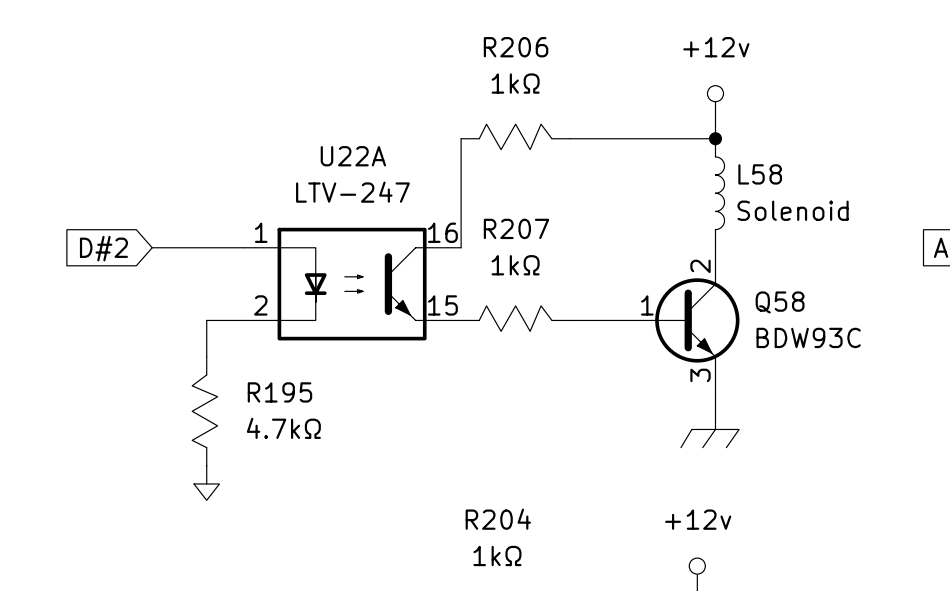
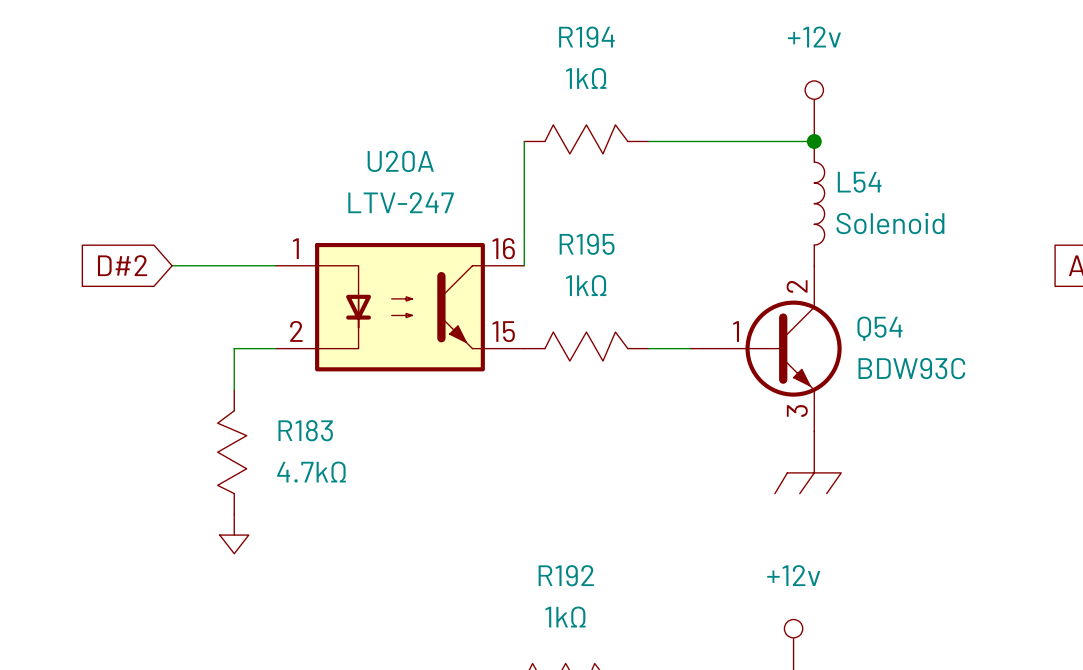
R206 name: R206 (516, 47) -> R194 (586, 37)
U22A name: U22A (353, 156) -> U20A (400, 161)
L58 name: L58 (760, 174) -> L54 (859, 182)
R207 name: R207 (516, 228) -> R195 (587, 244)
Q58 name: Q58 (780, 302) -> Q54 (879, 328)
R195 name: R195 (279, 392) -> R183 (305, 430)
R204 name: R204 (498, 519) -> R192 (566, 575)

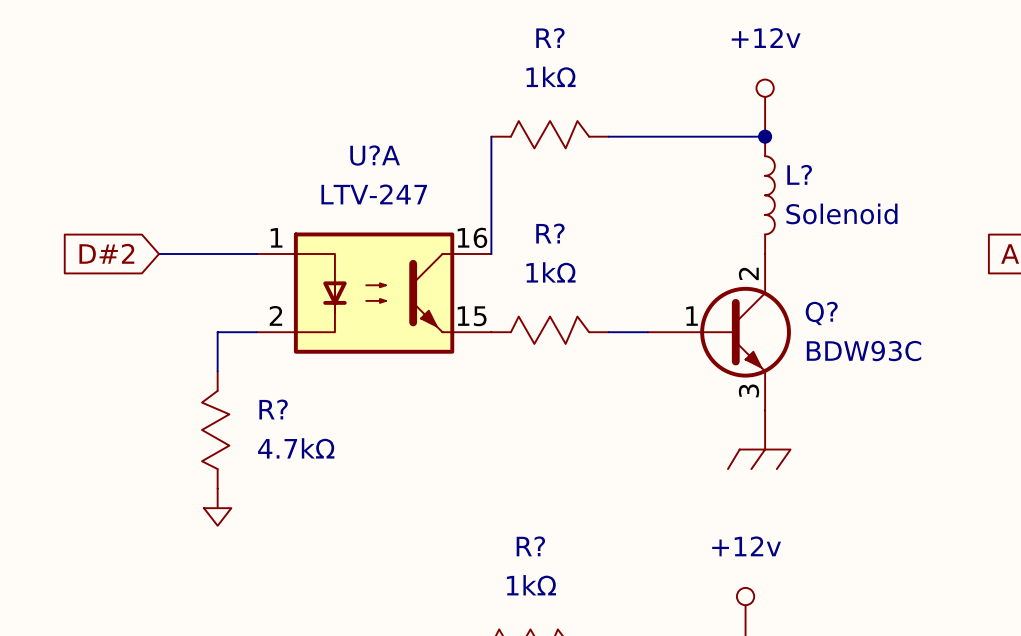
R194 name: R194 (586, 37) -> R? (550, 38)
U20A name: U20A (400, 161) -> U?A (375, 155)
L54 name: L54 (859, 182) -> L? (799, 174)
R195 name: R195 (587, 244) -> R? (550, 233)
Q54 name: Q54 (879, 328) -> Q? (821, 313)
R183 name: R183 (305, 430) -> R? (273, 409)
R192 name: R192 (566, 575) -> R? (530, 546)

